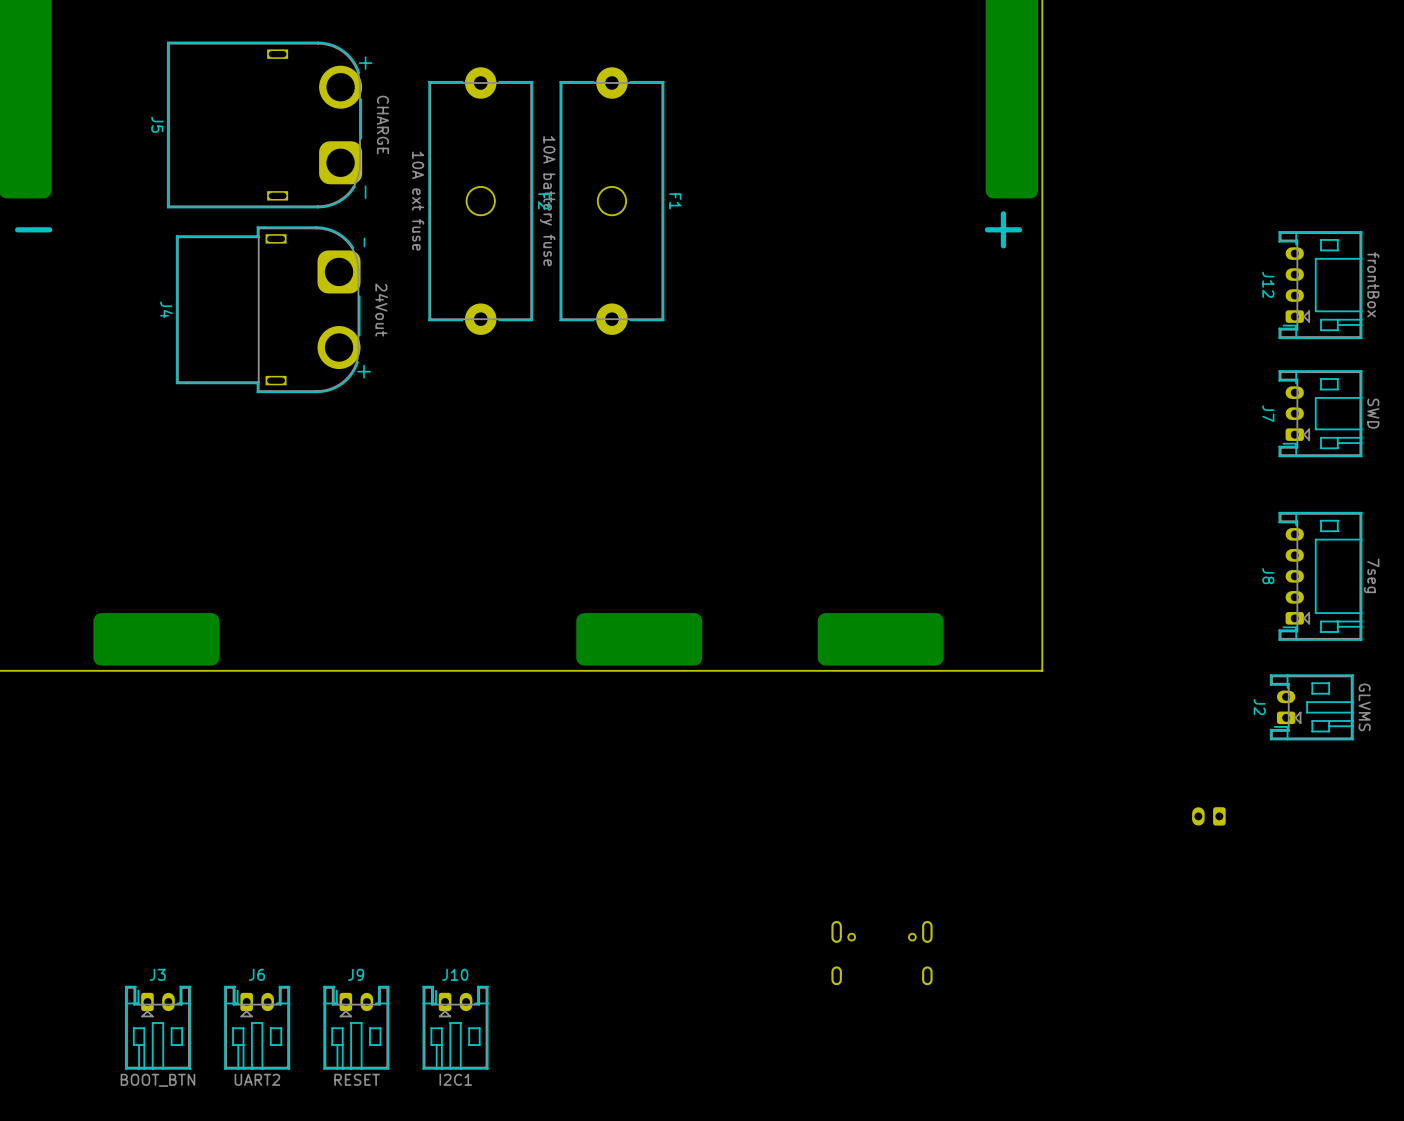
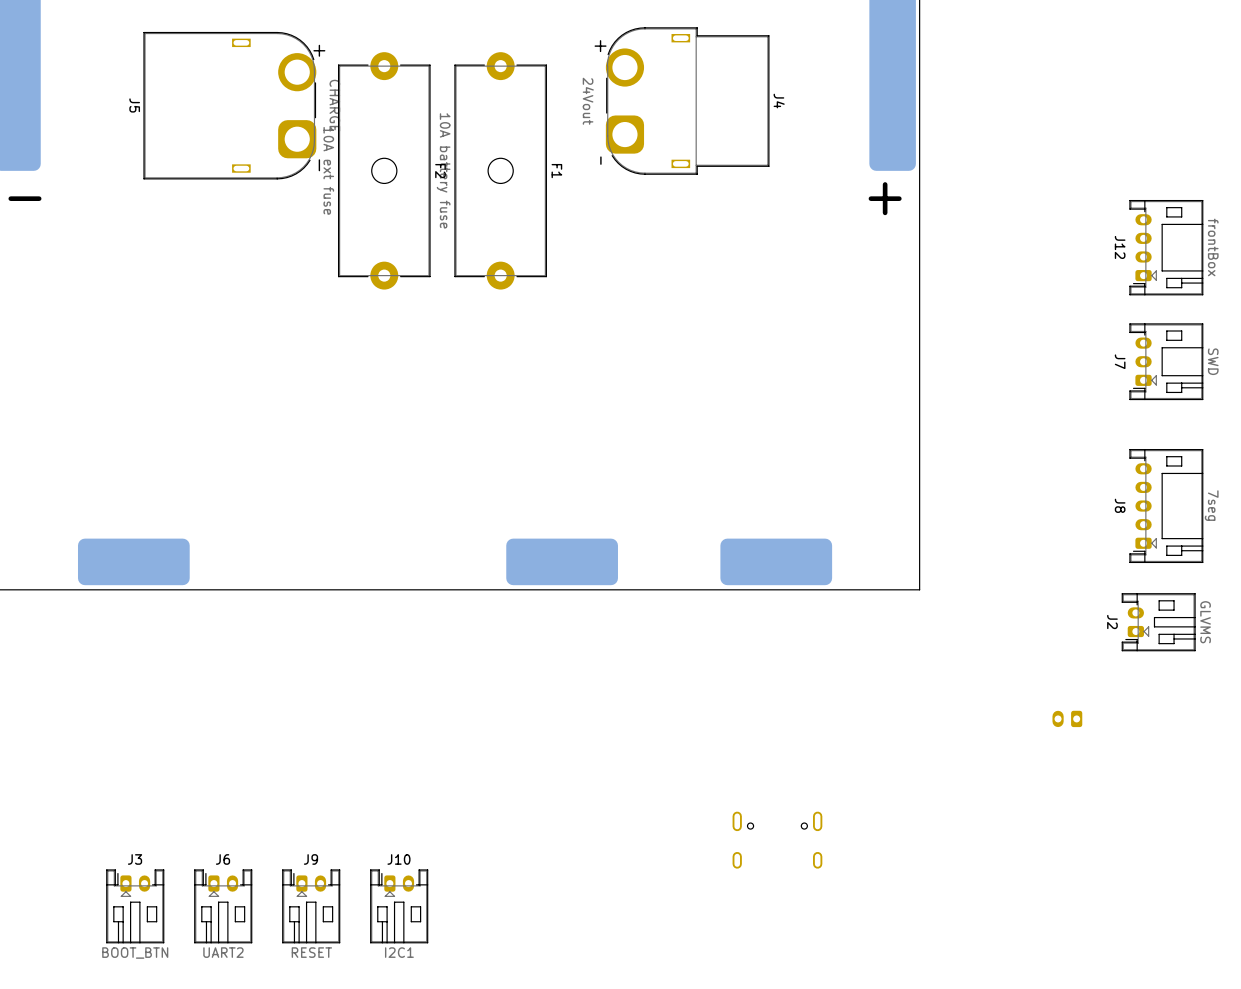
F2 position: (480, 201) -> (384, 170)
F1 position: (611, 201) -> (500, 170)
J4 rotation: 0° (268, 309) -> 180° (687, 101)
J4 position: (268, 309) -> (687, 101)

